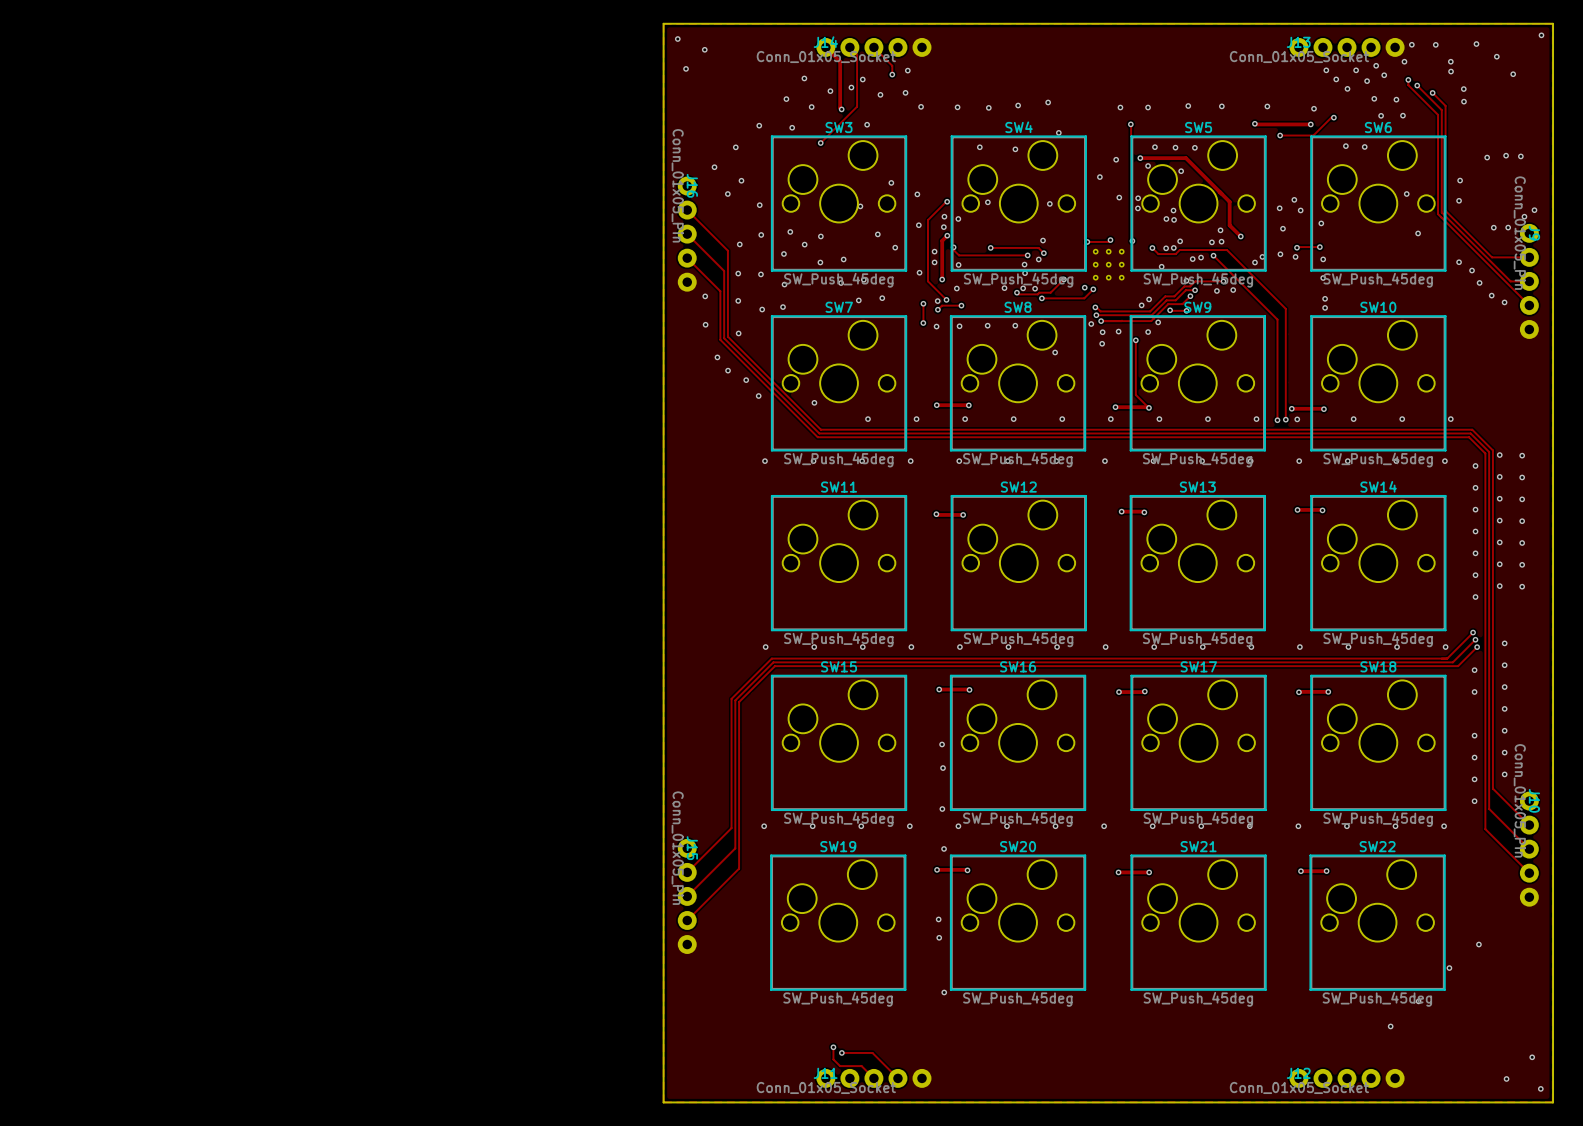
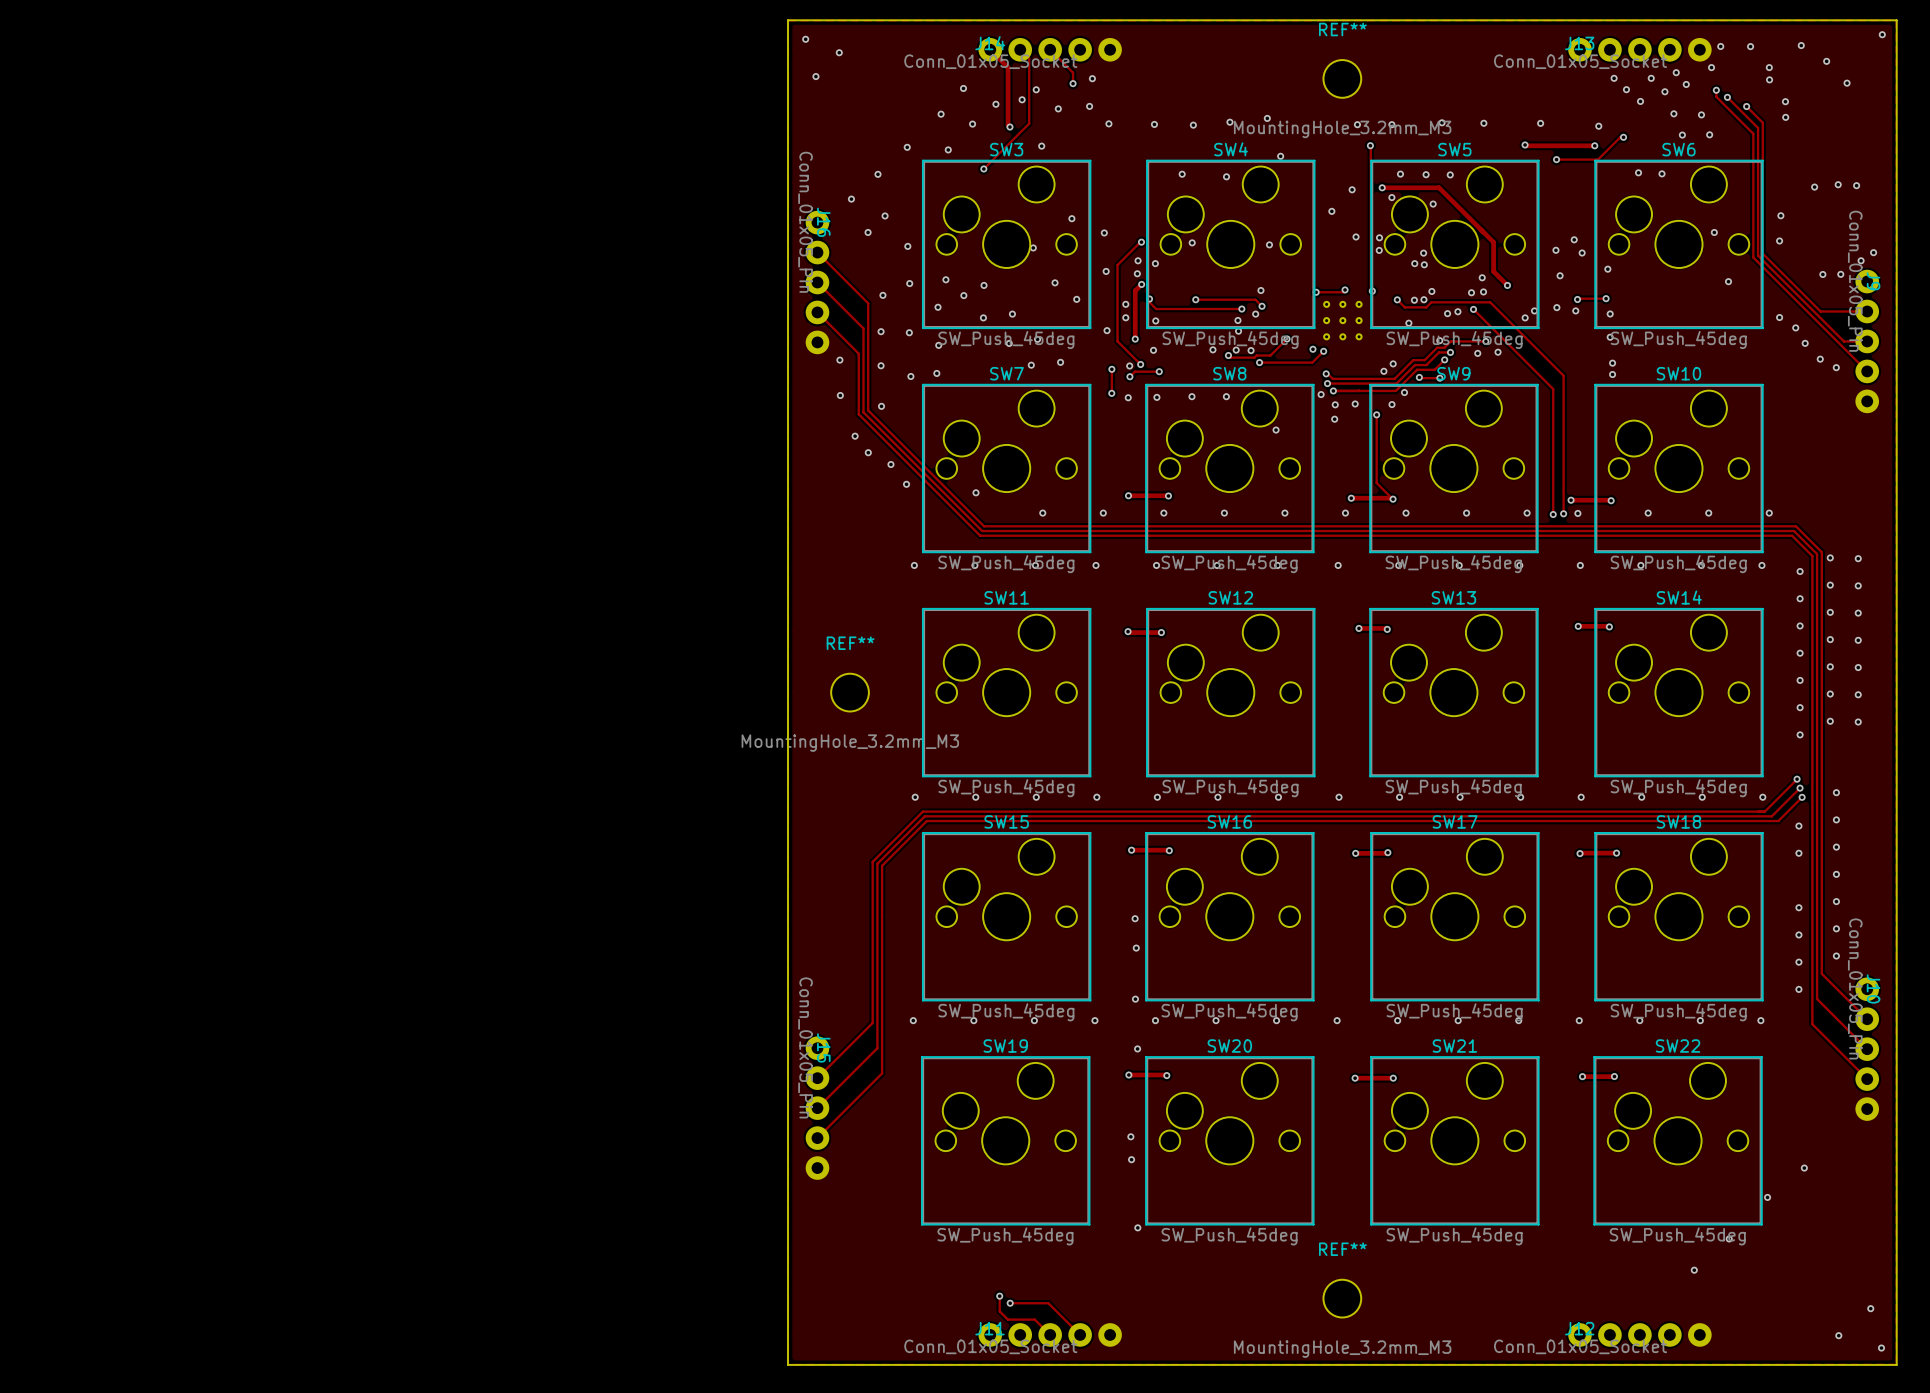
REF**: none -> MountingHole_3.2mm_M3 (1342, 78)
REF**: none -> MountingHole_3.2mm_M3 (850, 692)
REF**: none -> MountingHole_3.2mm_M3 (1342, 1298)

